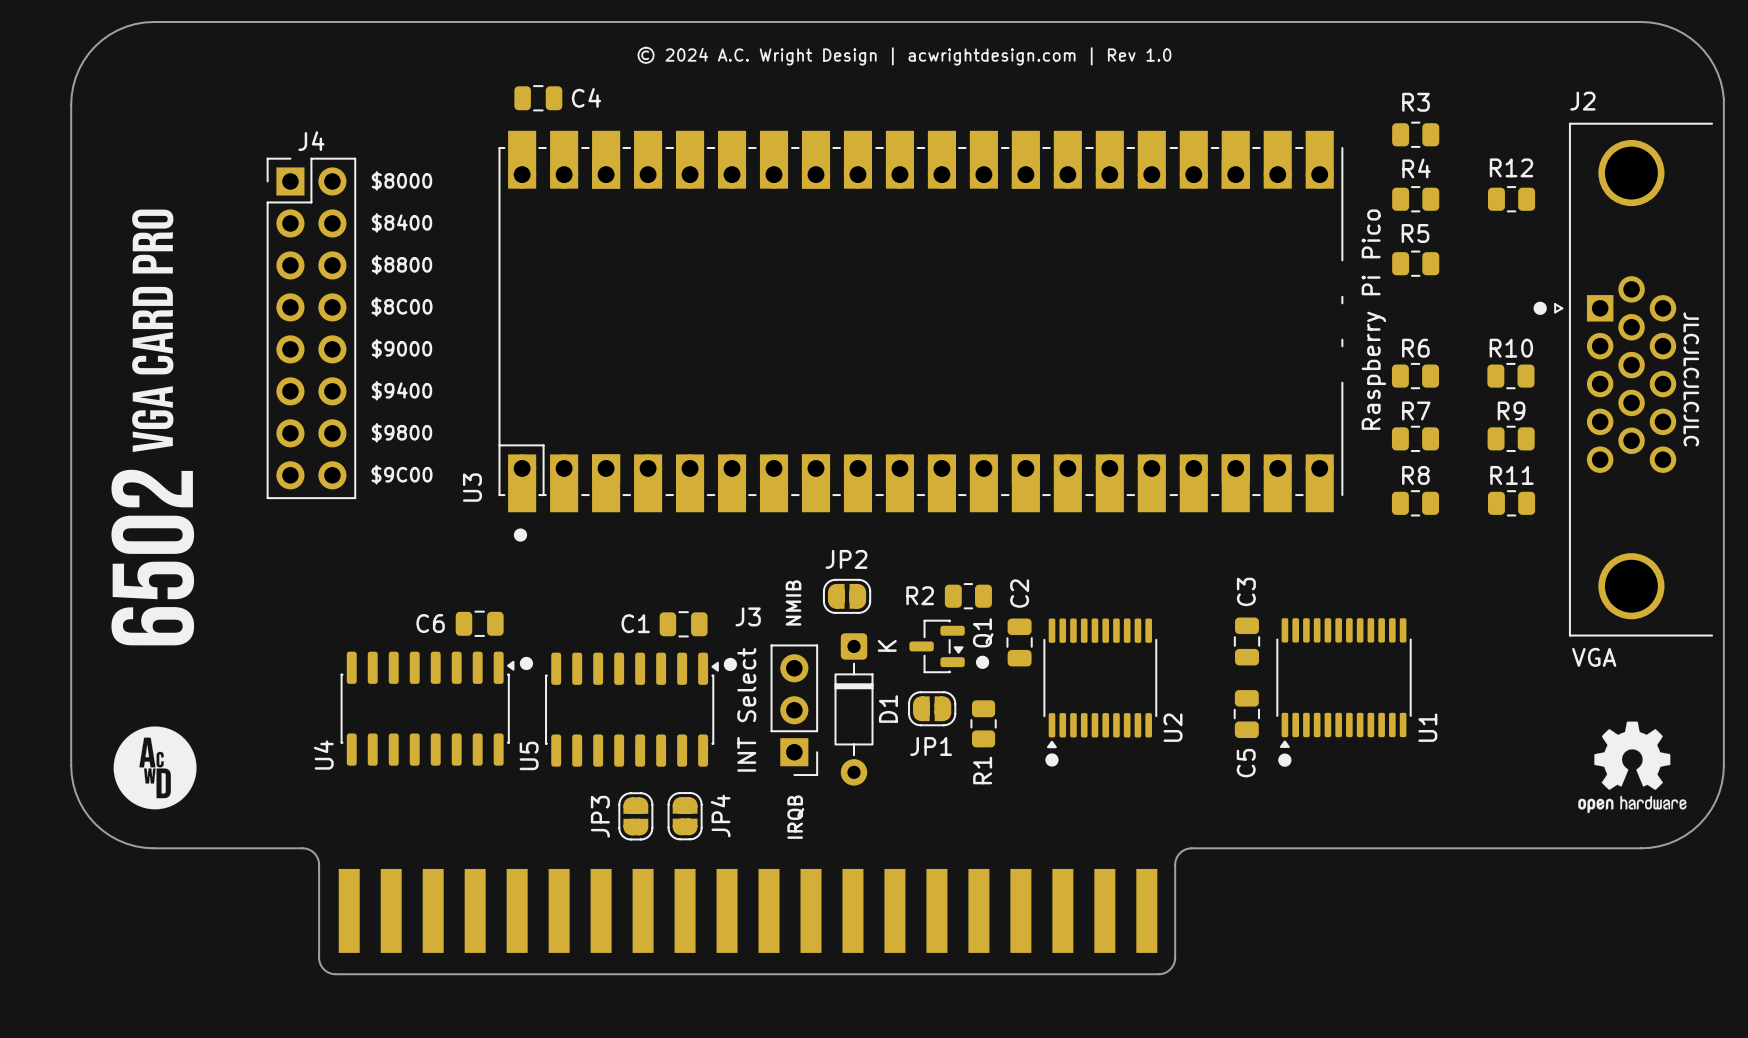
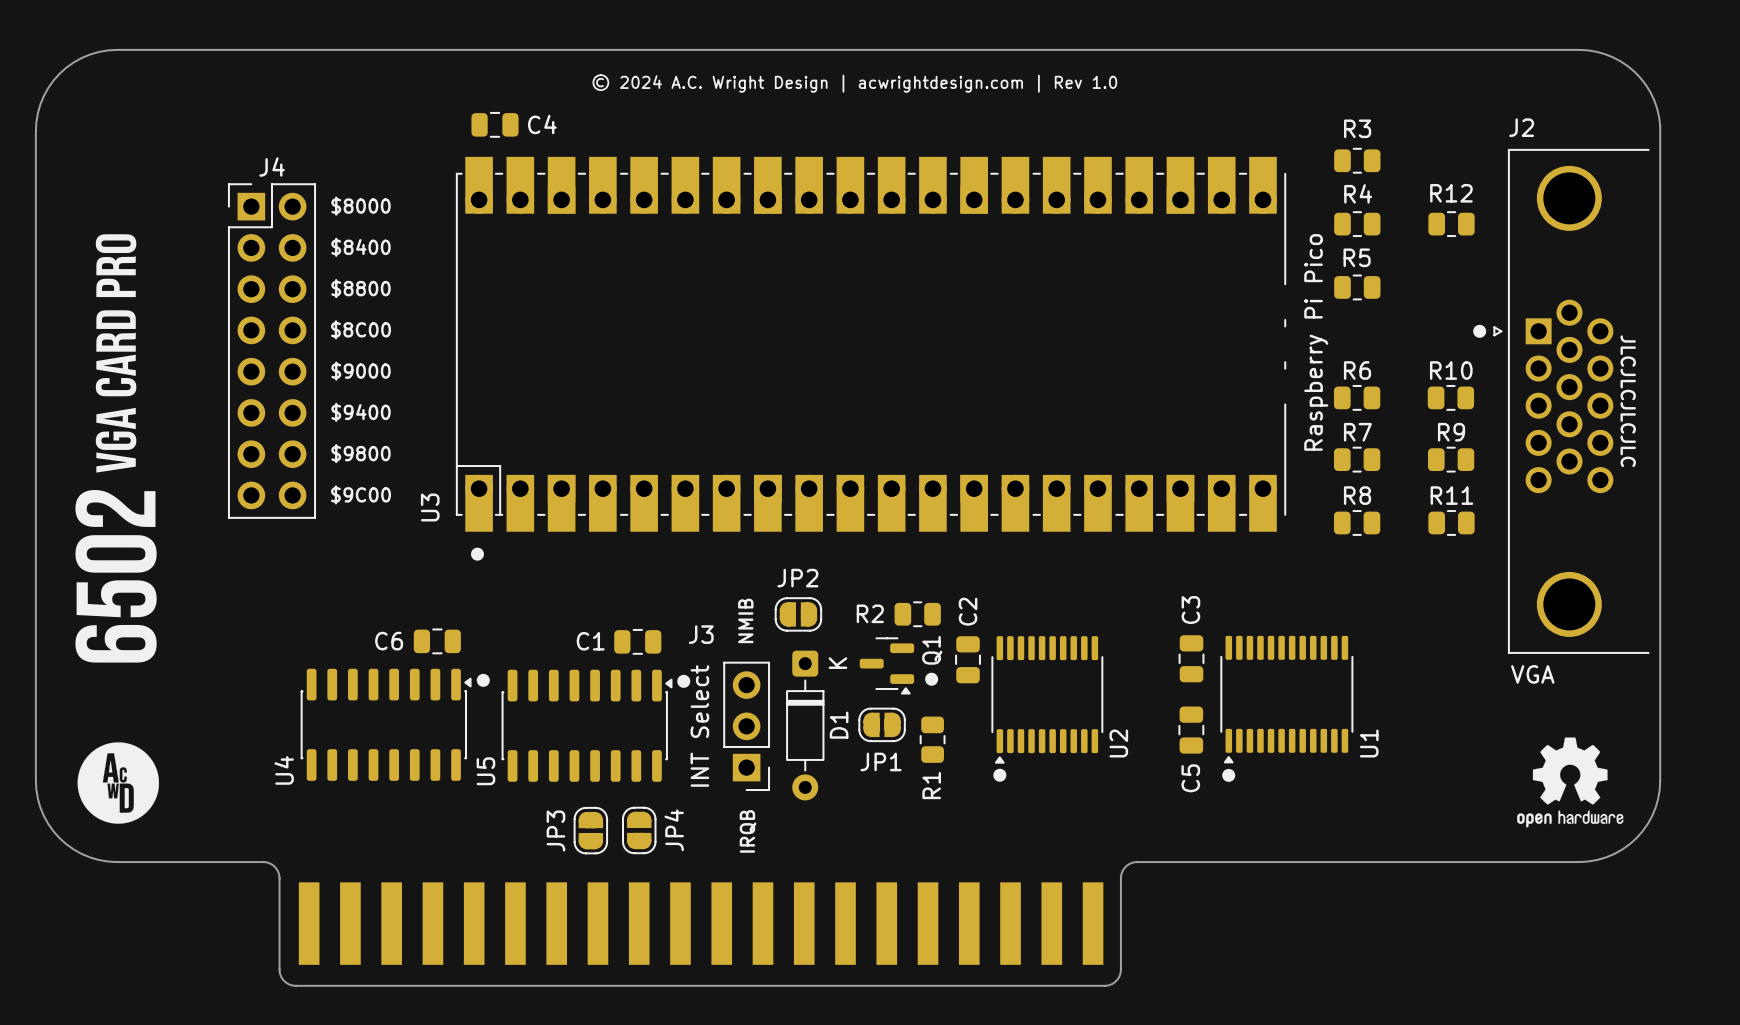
Q1 footprint: [909, 619, 965, 674] -> [859, 637, 915, 695]

